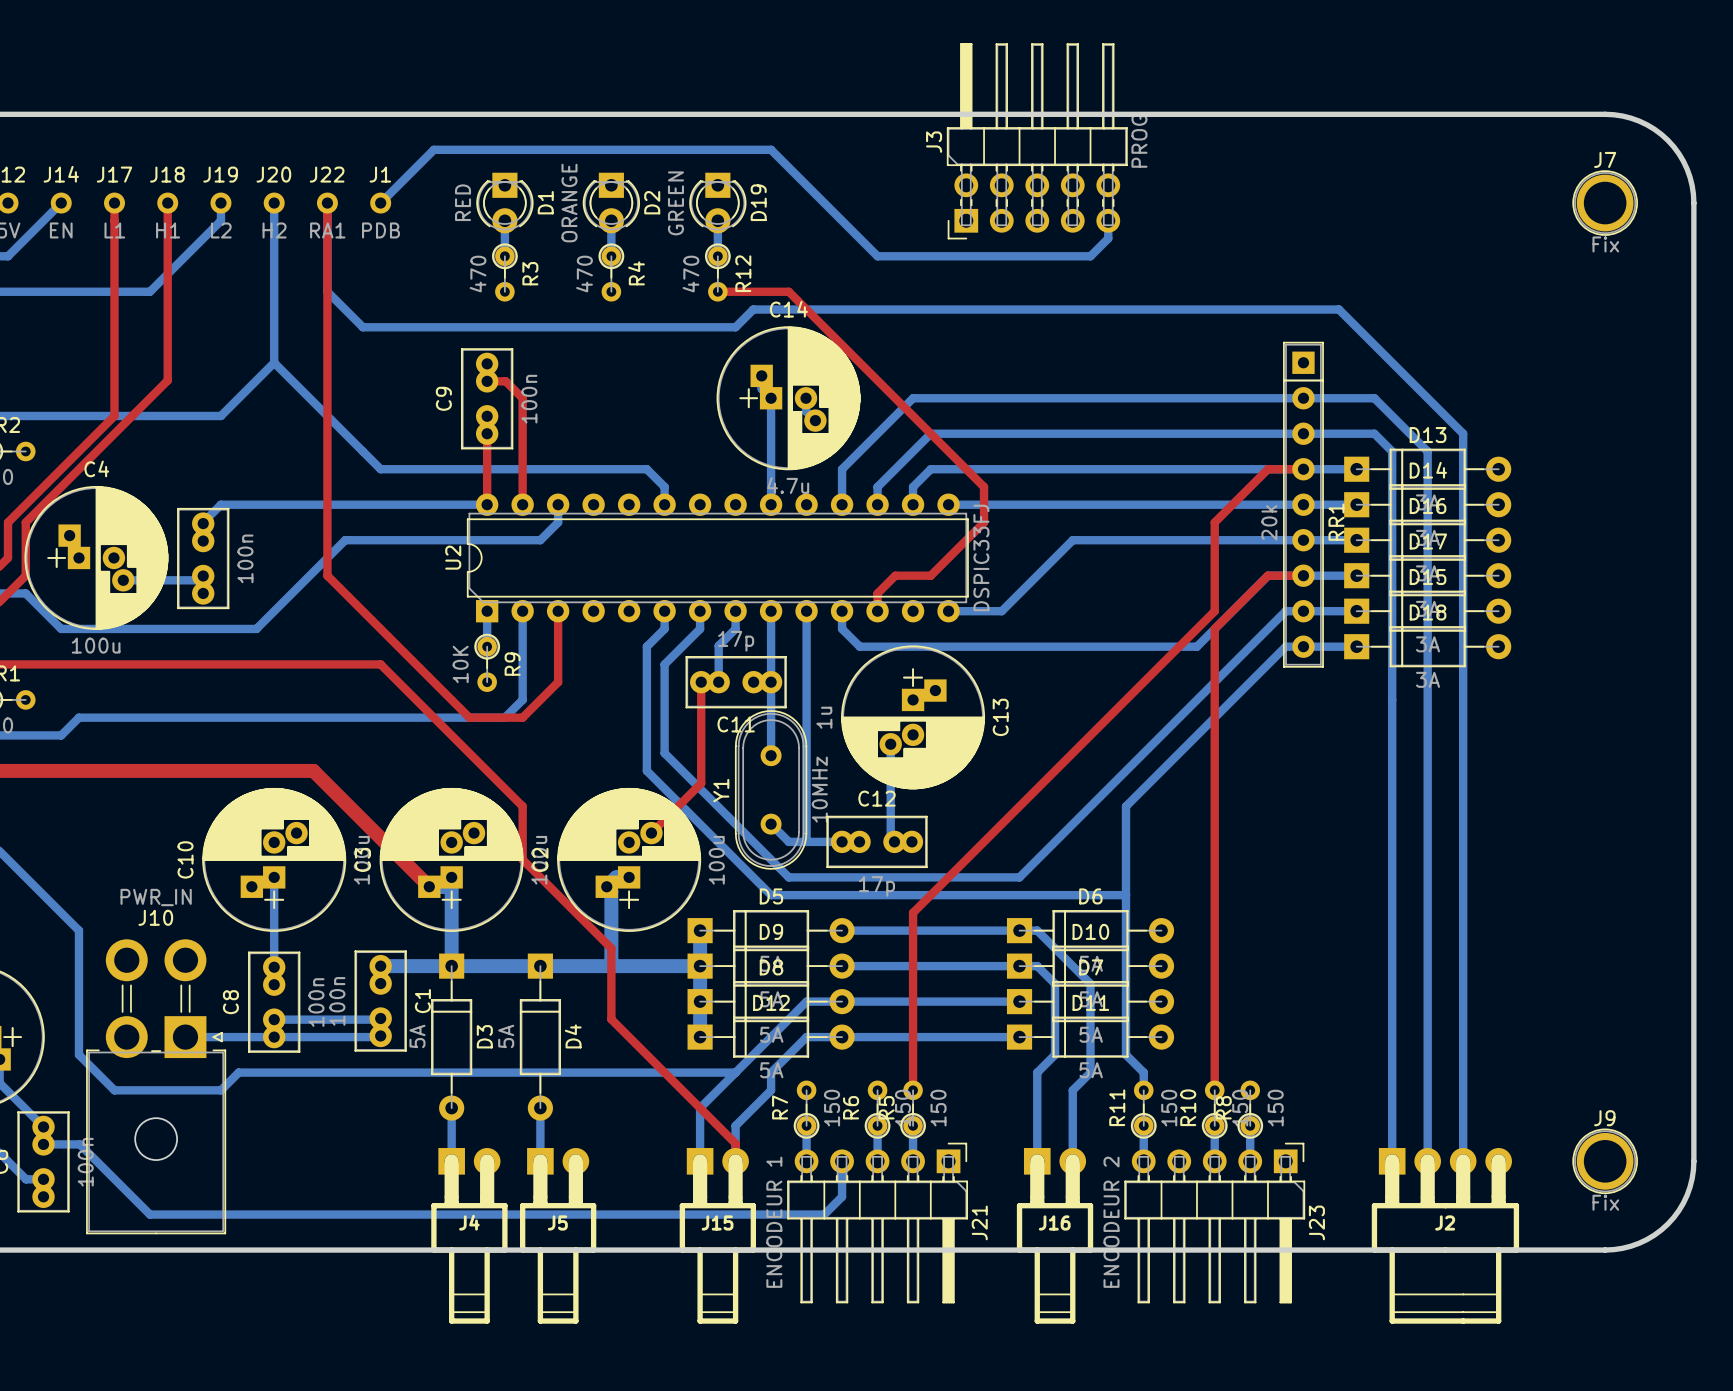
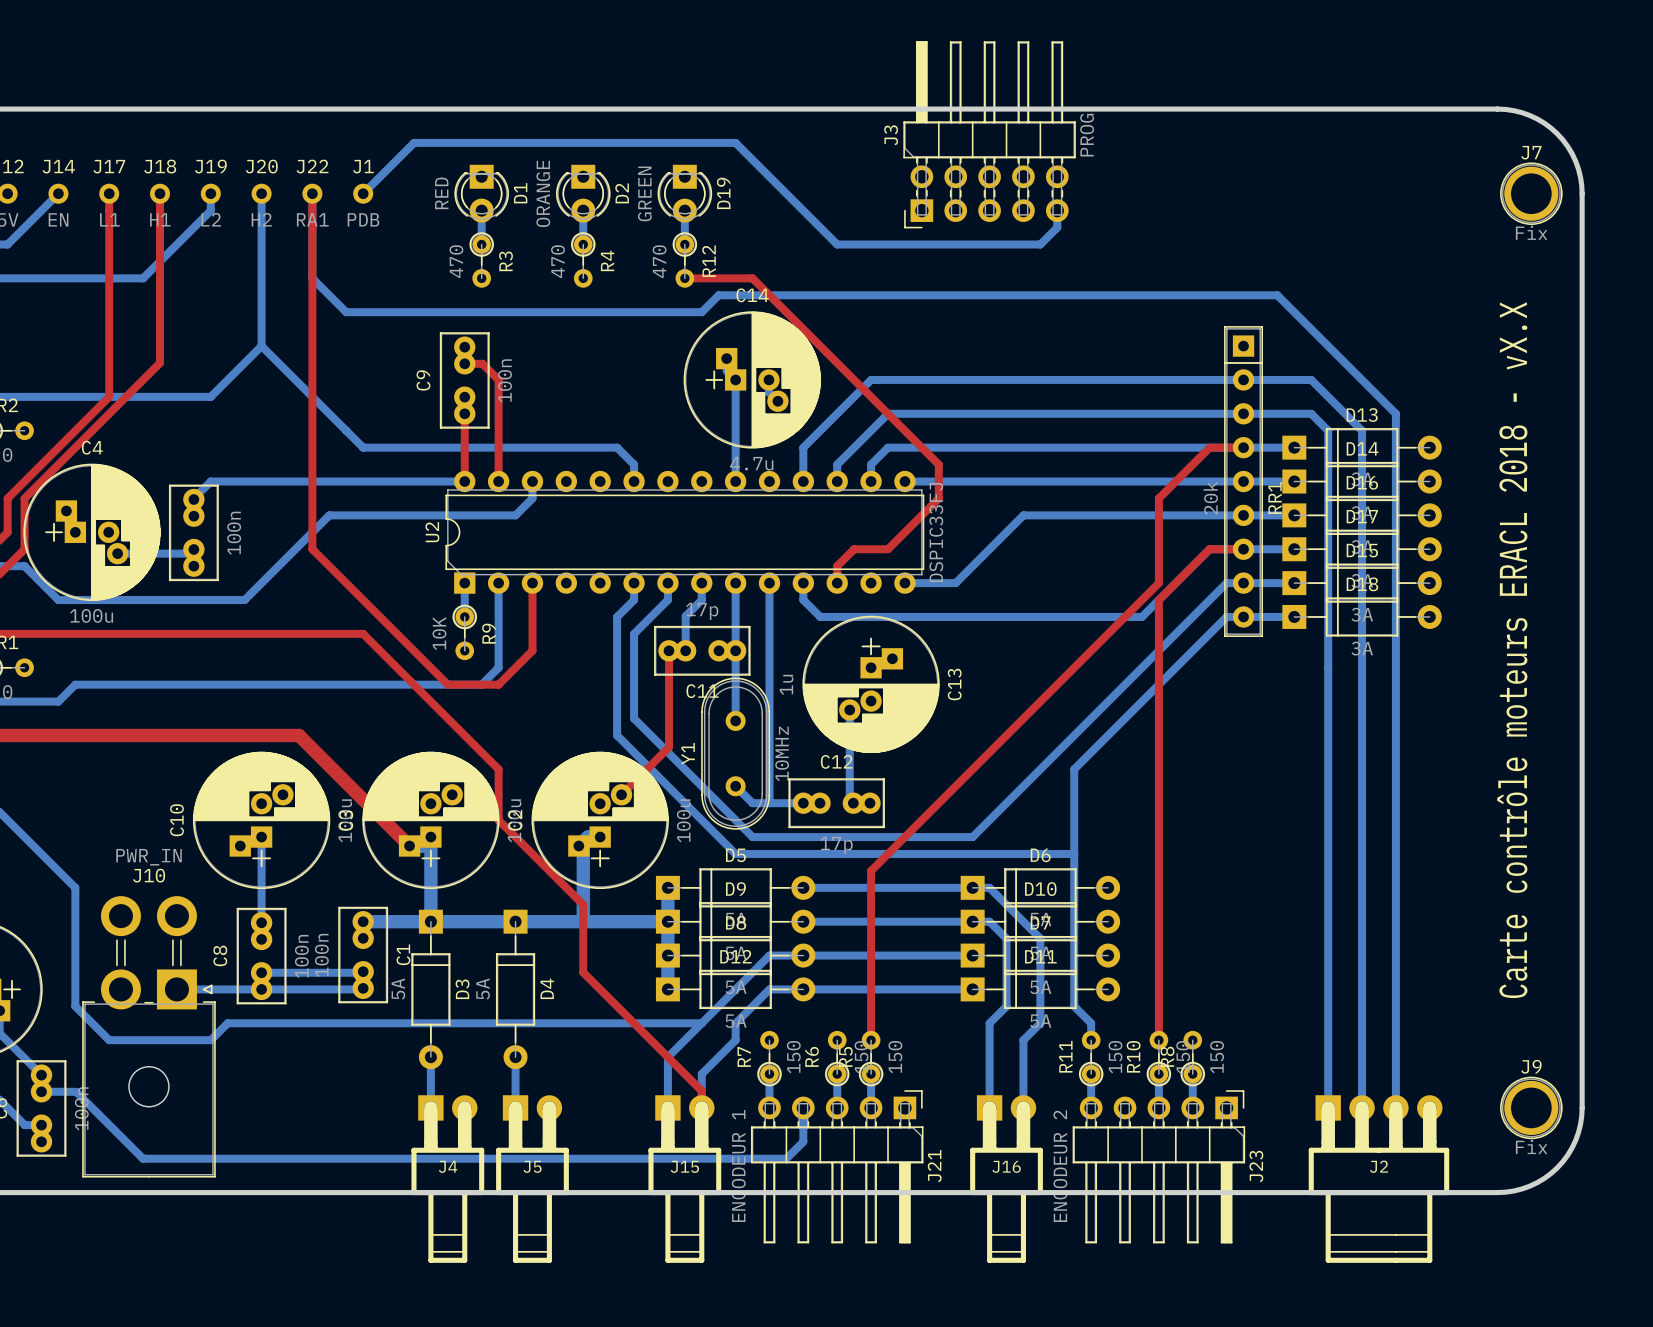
board edge: (1569, 114) (1622, 116) (1639, 121) (1654, 129) (1667, 140) (1678, 153) (1690, 177) (1693, 194) (1693, 1161) (1690, 1187) (1683, 1203) (1667, 1224) (1654, 1235) (1639, 1243) (1622, 1248) (1569, 1250) -> (1497, 109) (1514, 110) (1529, 115) (1544, 123) (1557, 133) (1567, 146) (1575, 161) (1580, 177) (1582, 193) (1581, 1116) (1578, 1132) (1572, 1147) (1557, 1167) (1544, 1178) (1529, 1186) (1514, 1190) (1497, 1192)
text: none -> Carte contrôle moteurs ERACL 2018 - vX.X (1512, 650)

